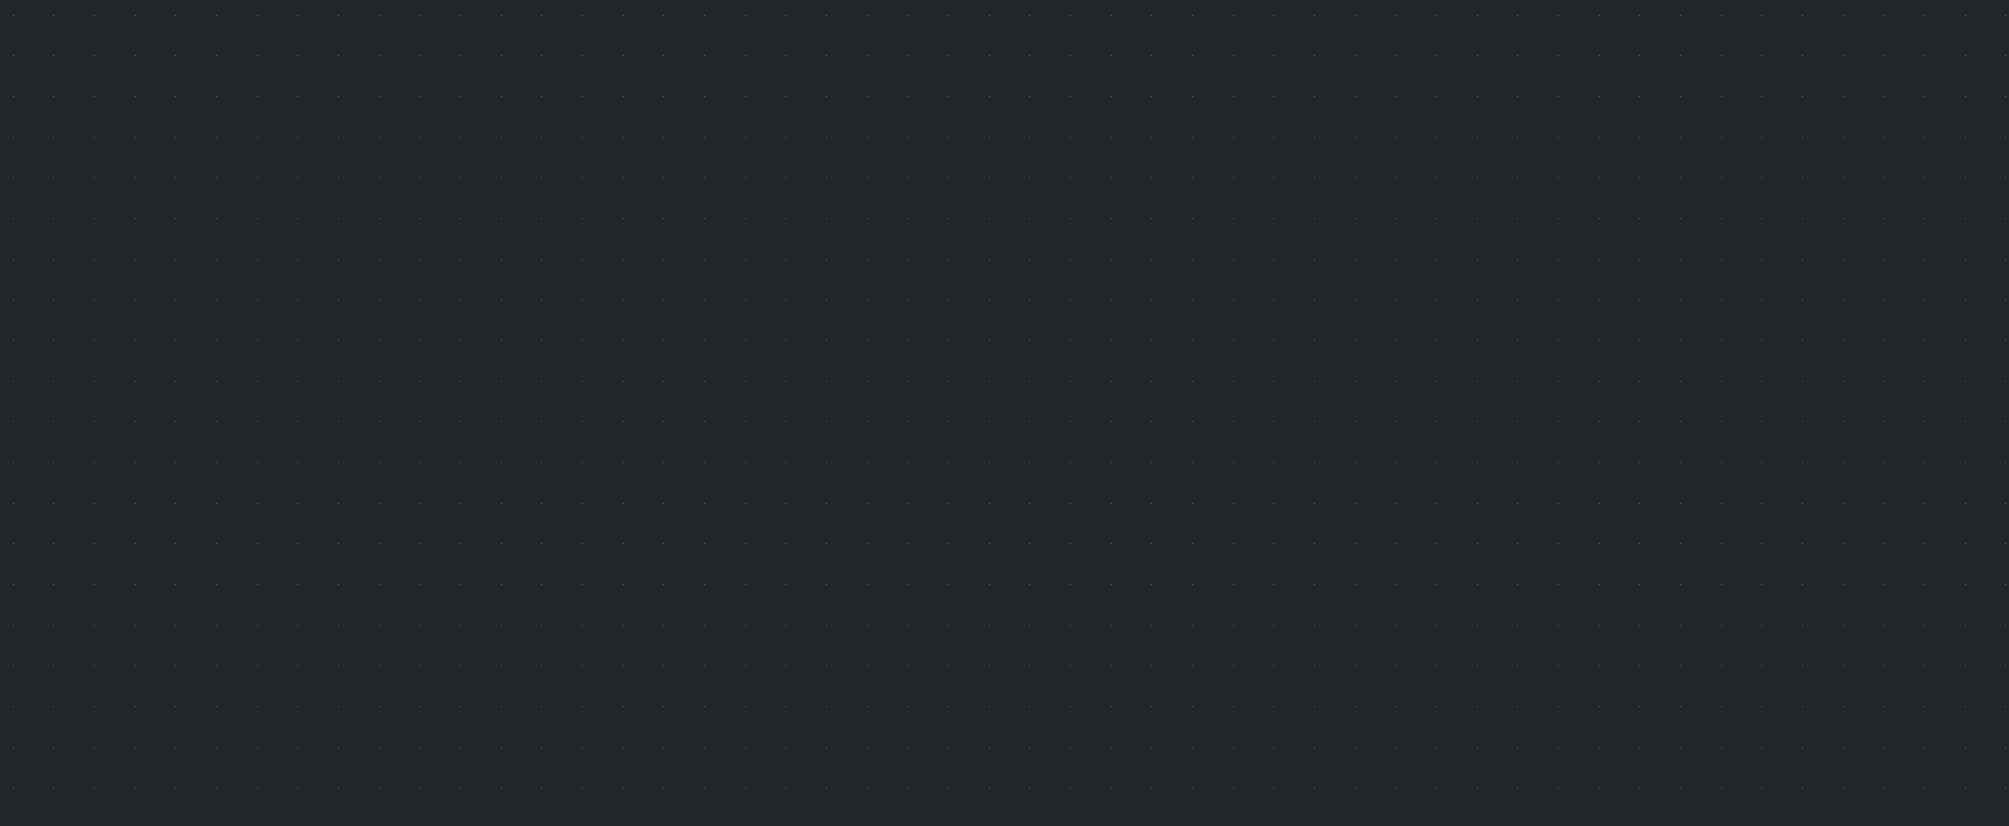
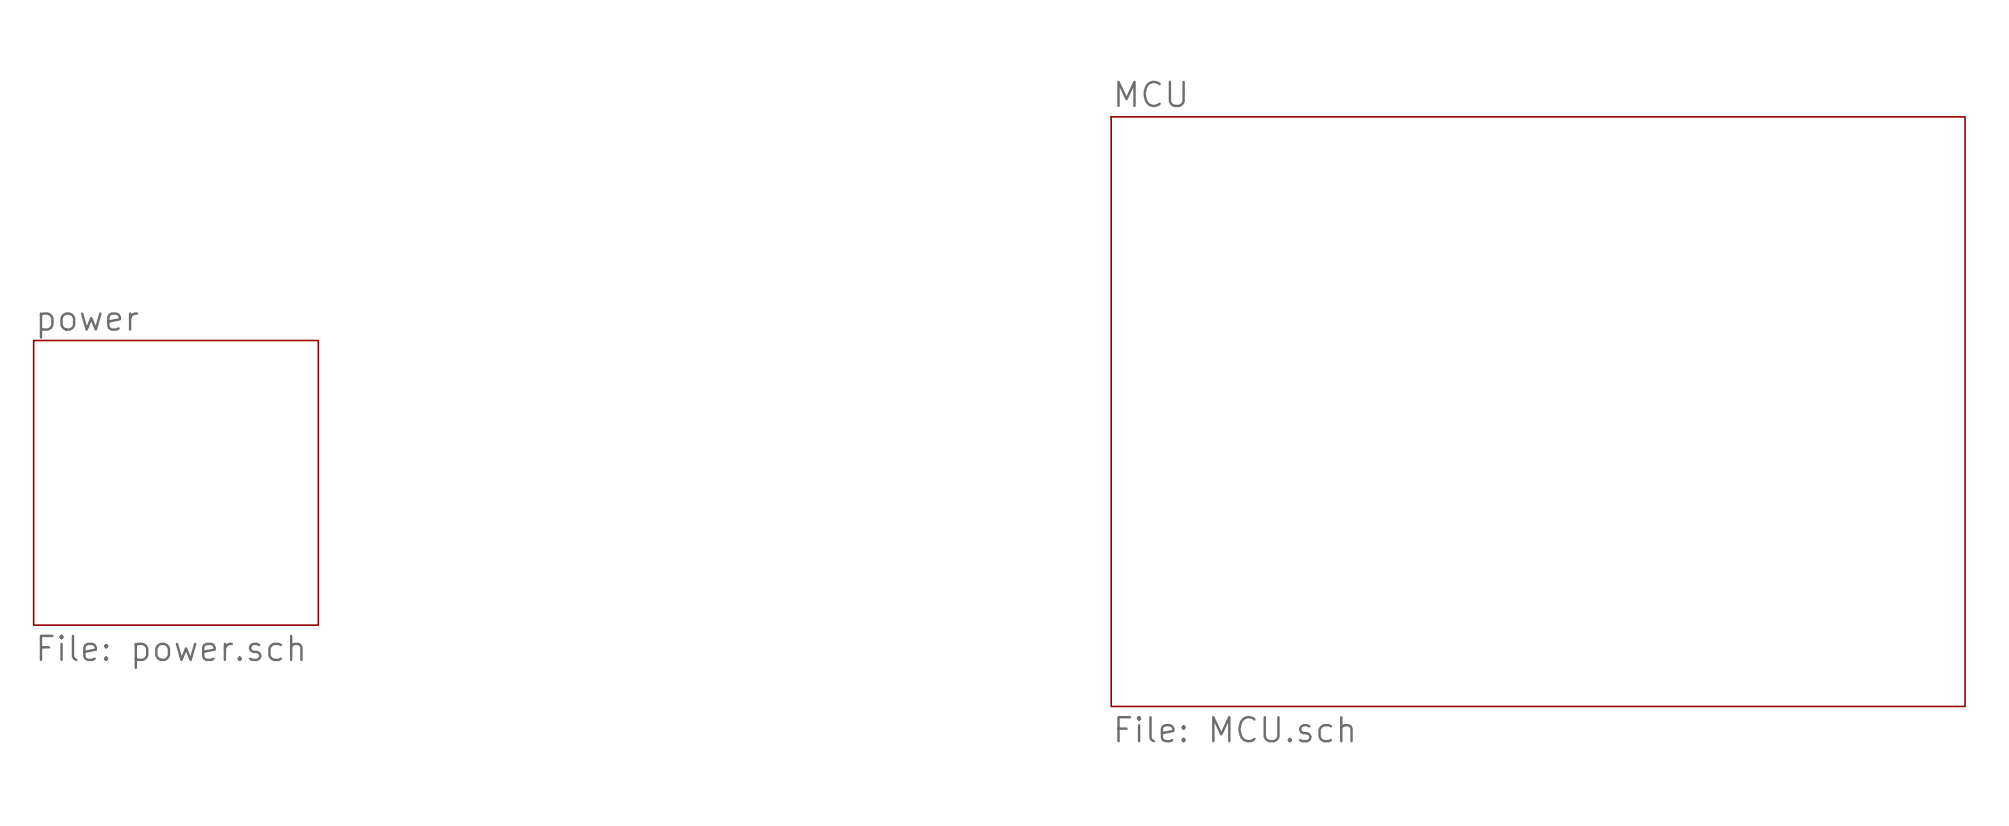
sheet MCU: none -> File: MCU.sch (1538, 411)
sheet power: none -> File: power.sch (175, 482)

